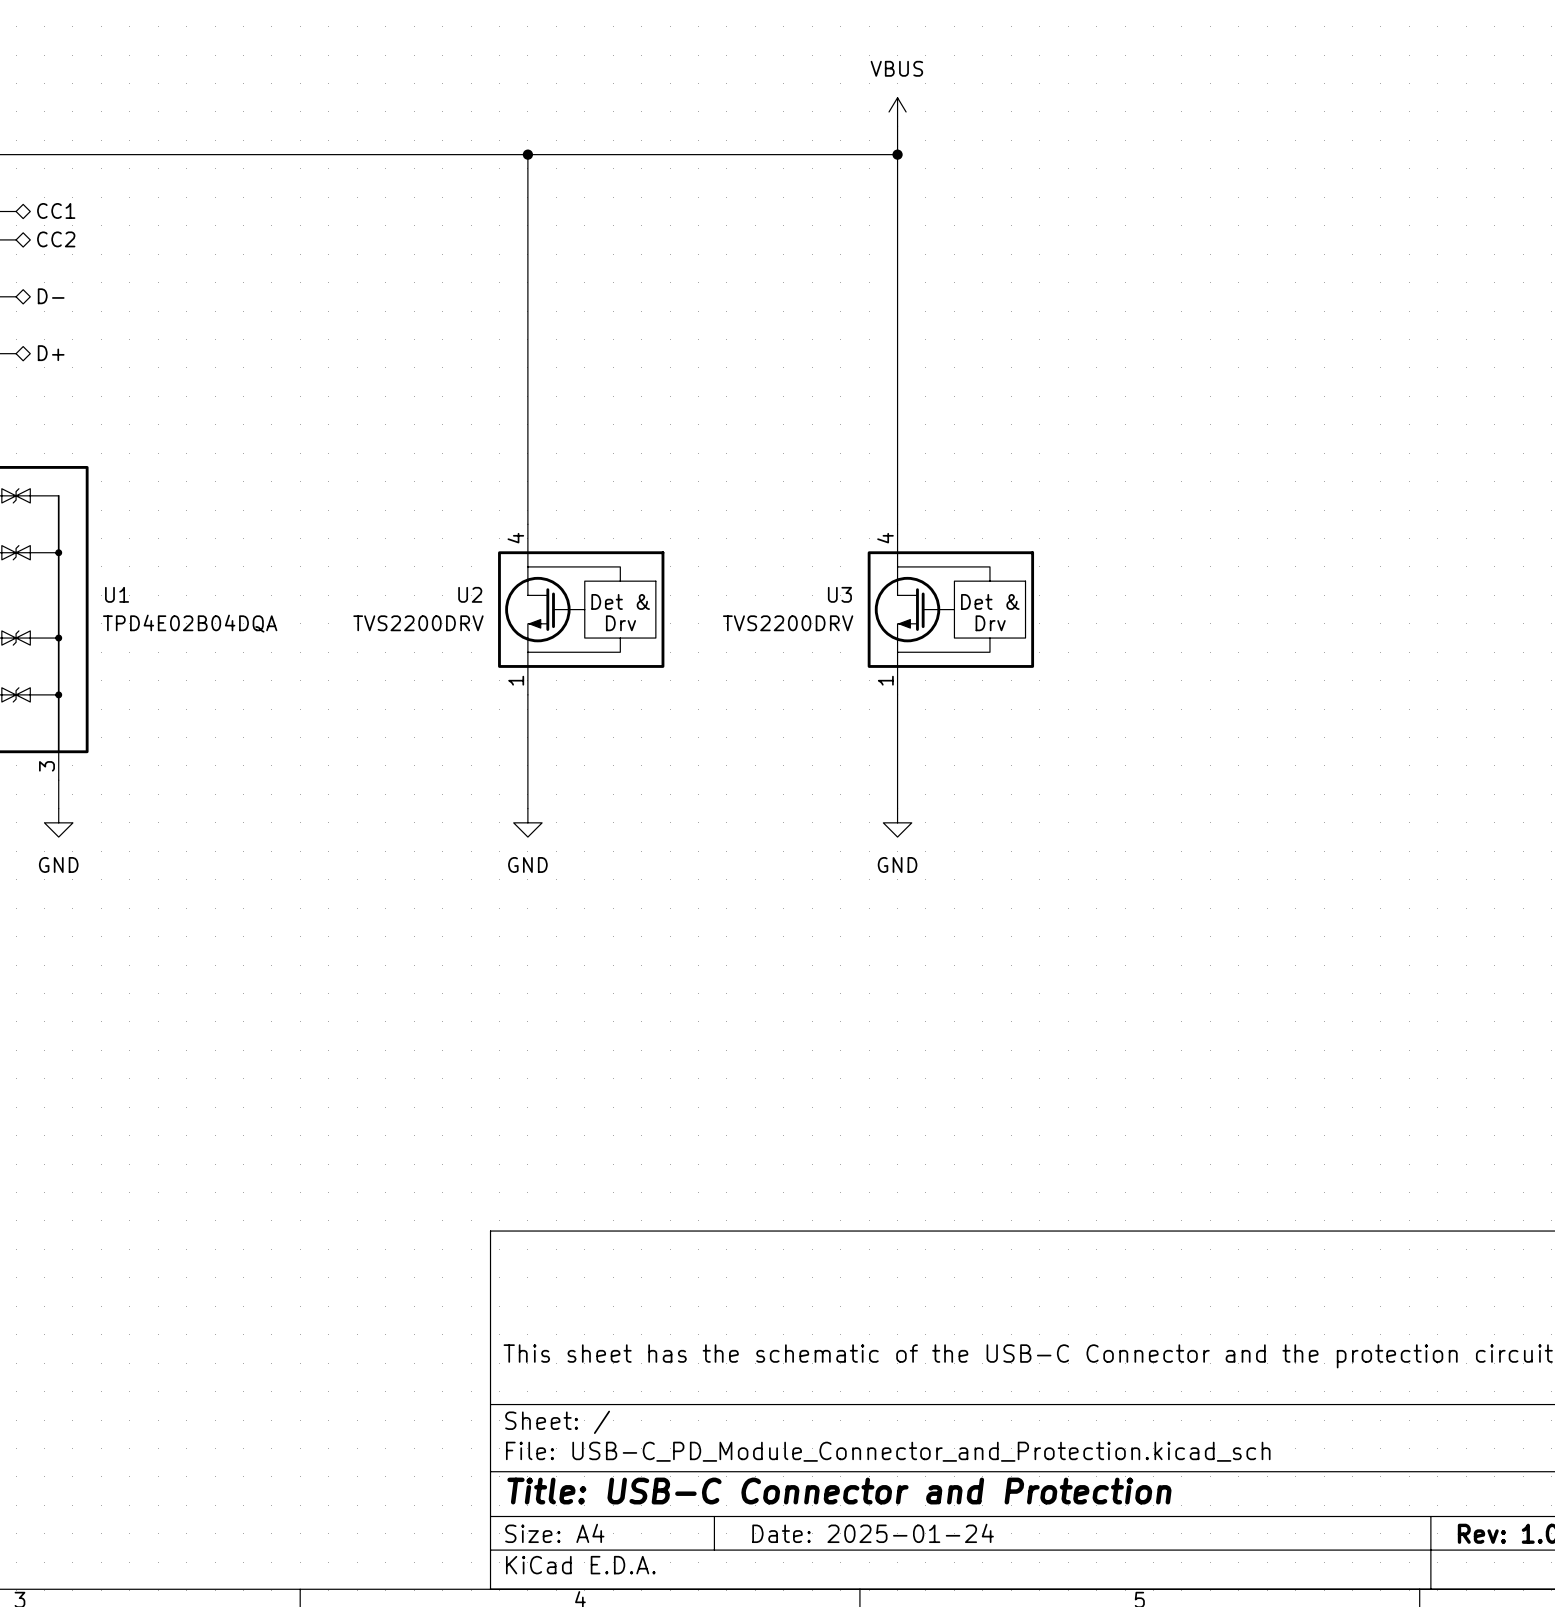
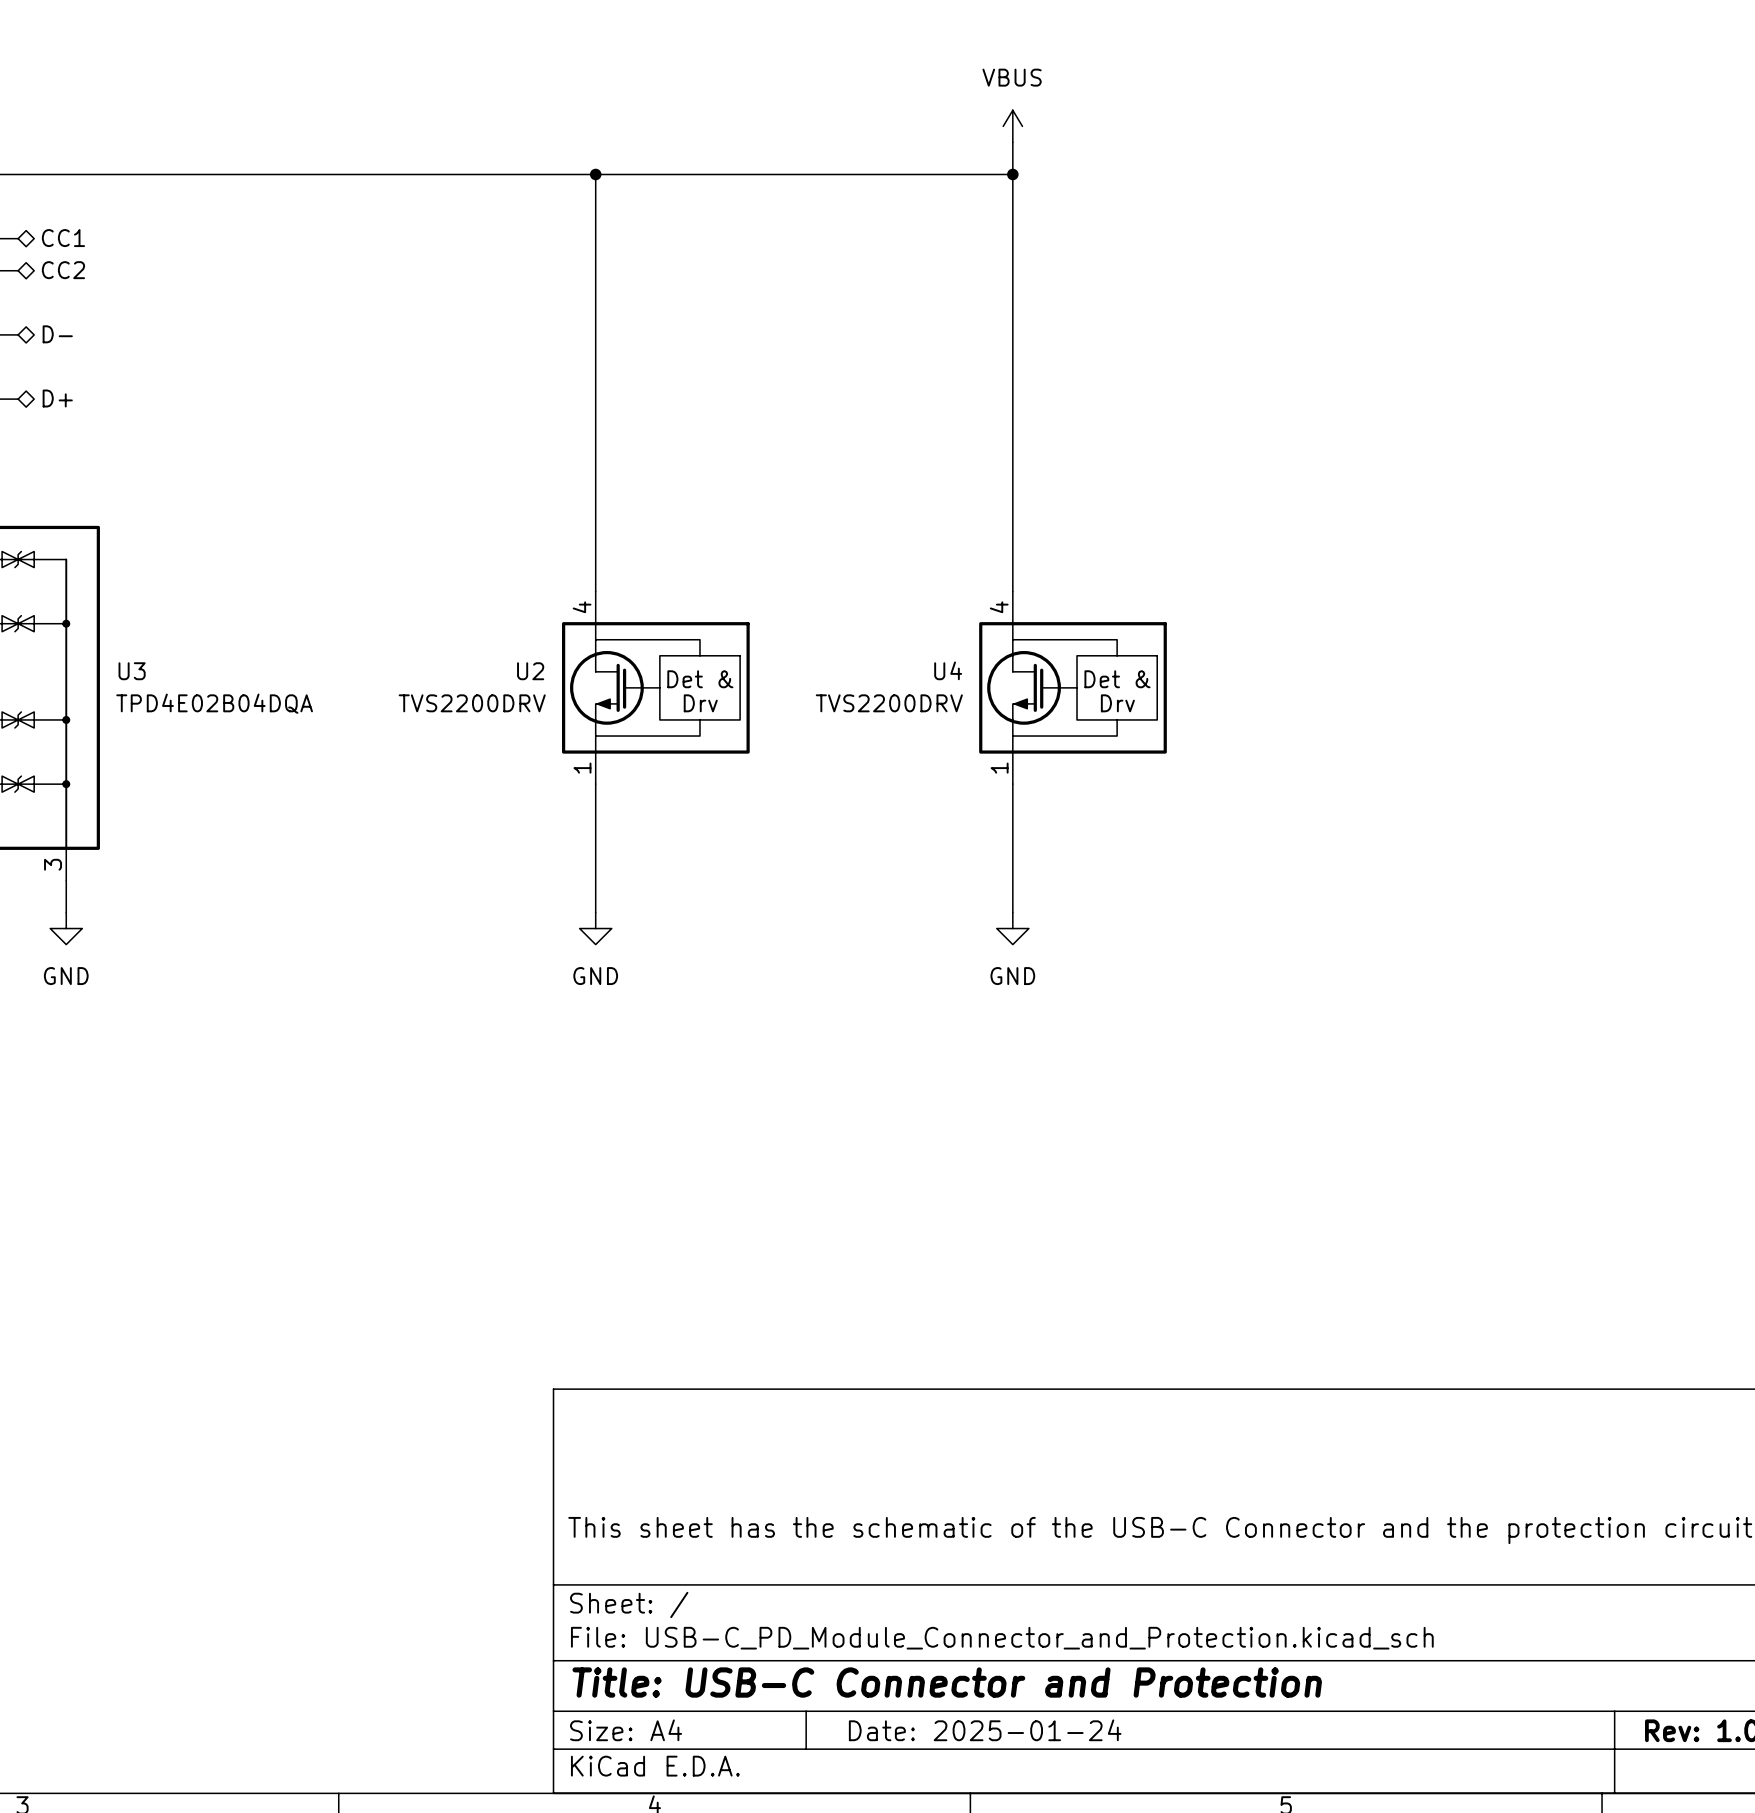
U1 name: U1 (117, 594) -> U3 (132, 671)
U3 name: U3 (839, 594) -> U4 (948, 670)

